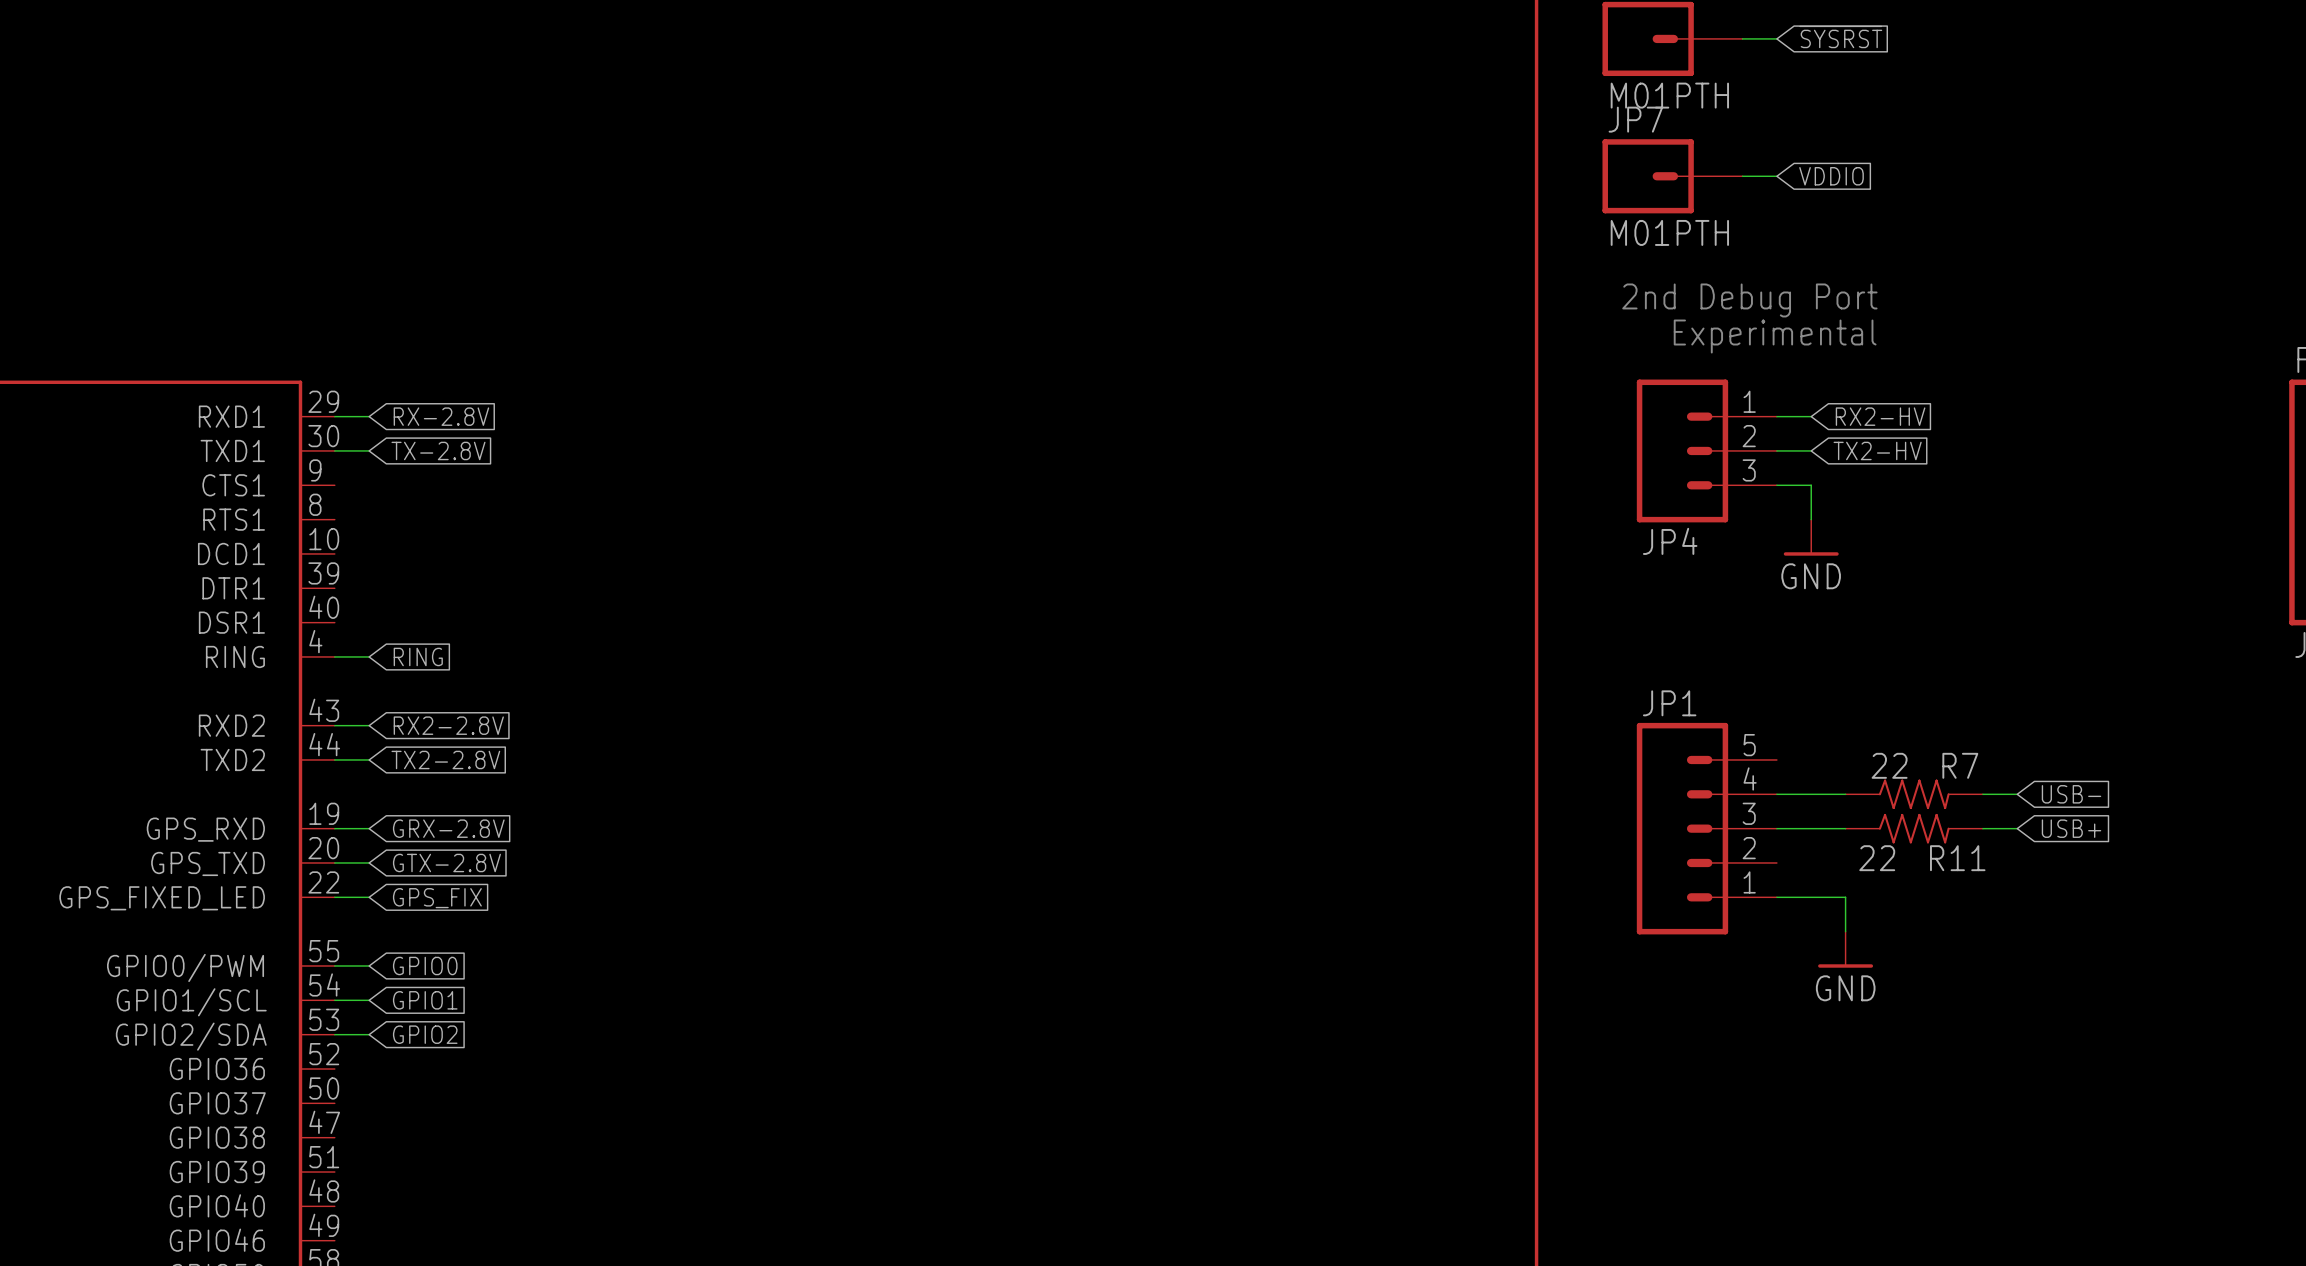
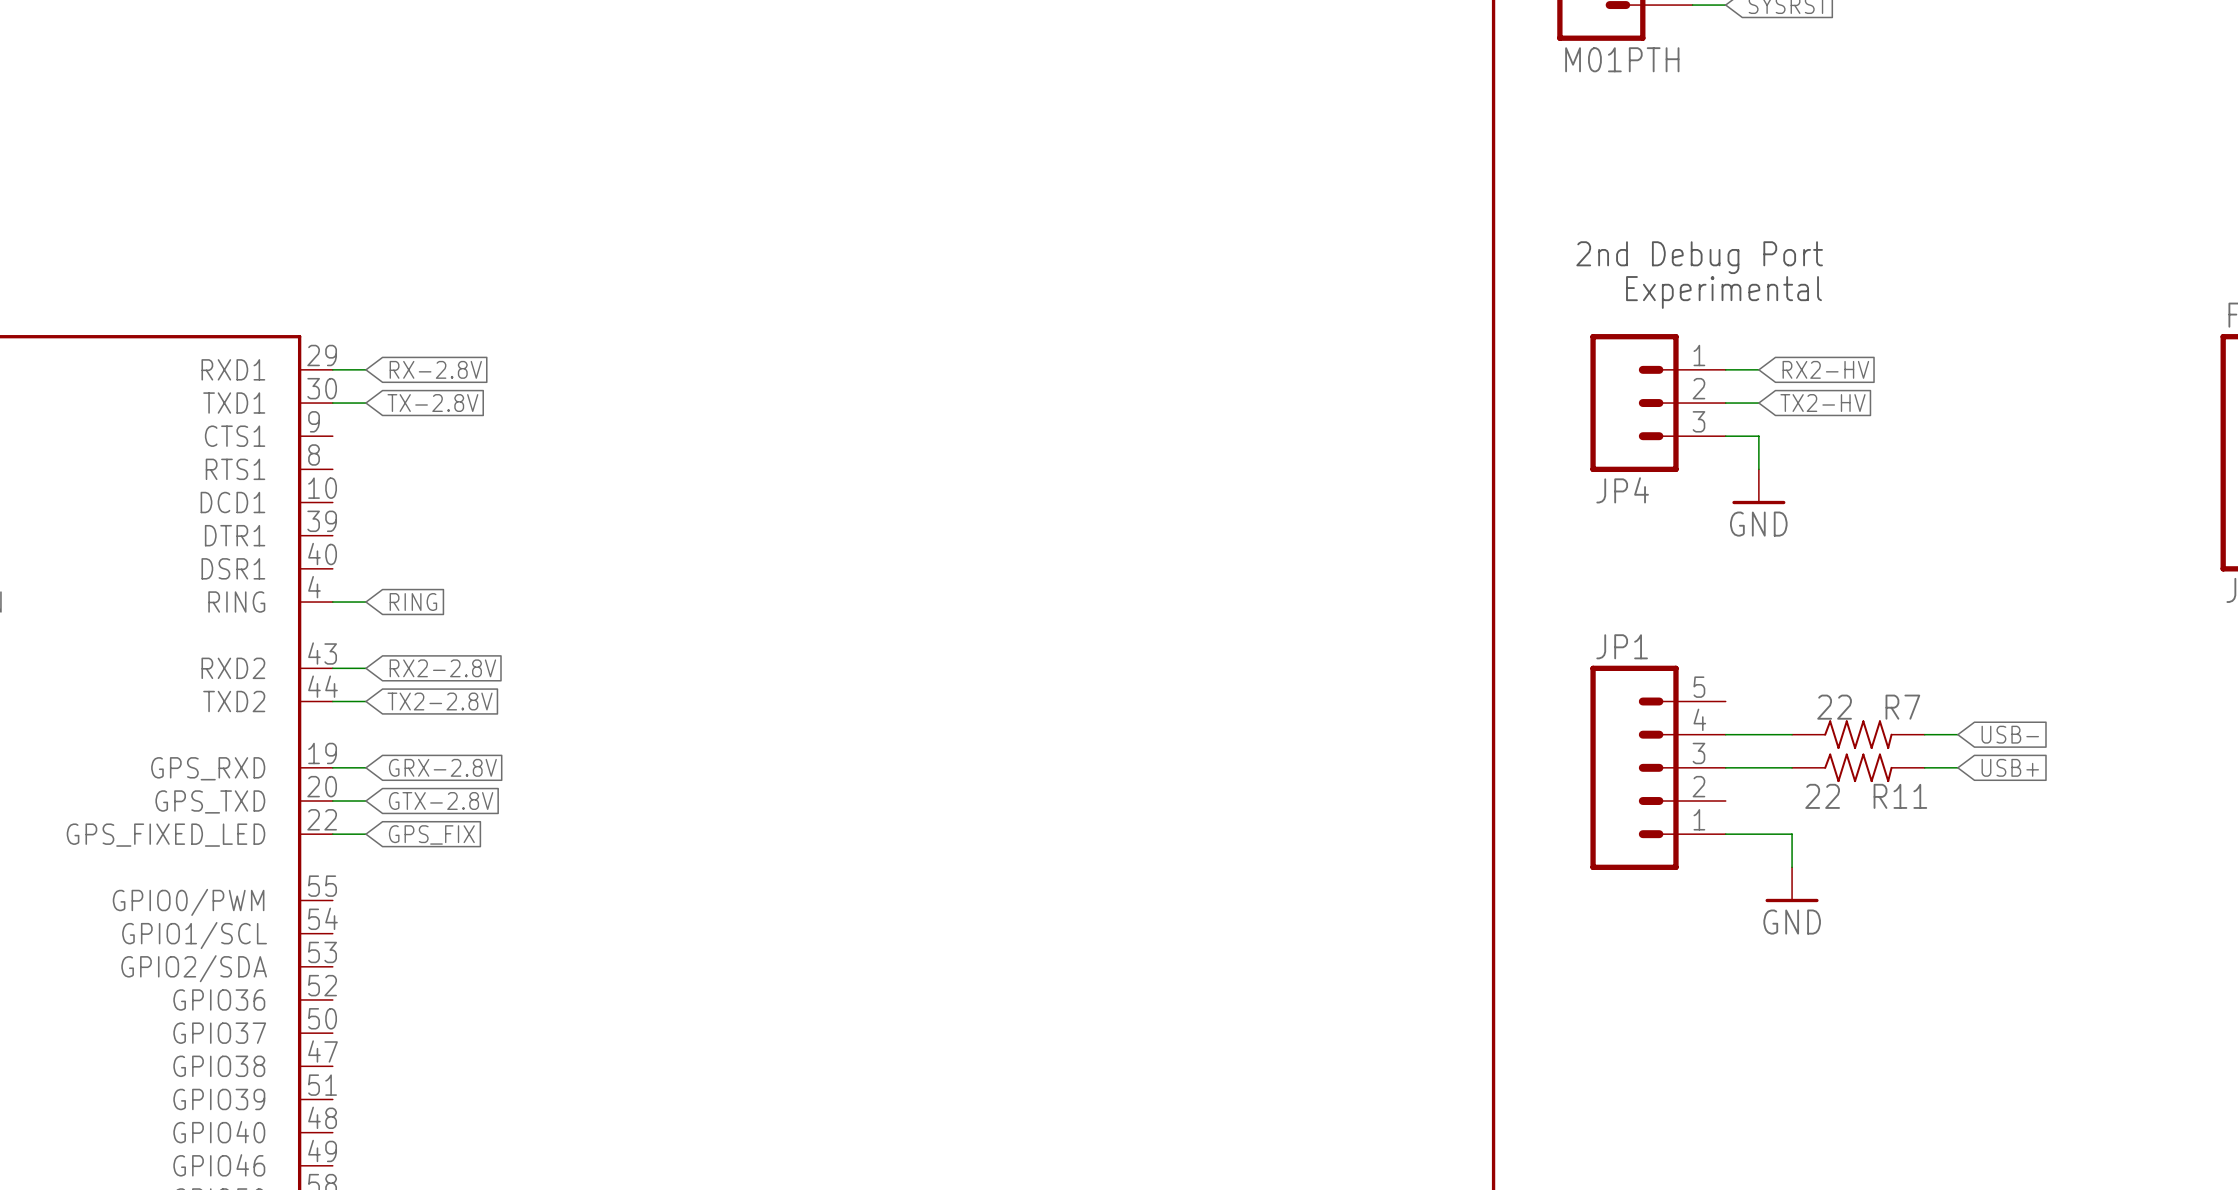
JP7: M01PTH (1672, 176) -> none
wire: (1742, 176) (1776, 176) -> none
global label: VDDIO (1831, 176) -> none
wire: (334, 965) (369, 965) -> none
global label: GPIO0 (425, 965) -> none
wire: (334, 1000) (369, 1000) -> none
global label: GPIO1 (425, 1000) -> none
wire: (334, 1034) (369, 1034) -> none
global label: GPIO2 (425, 1034) -> none

